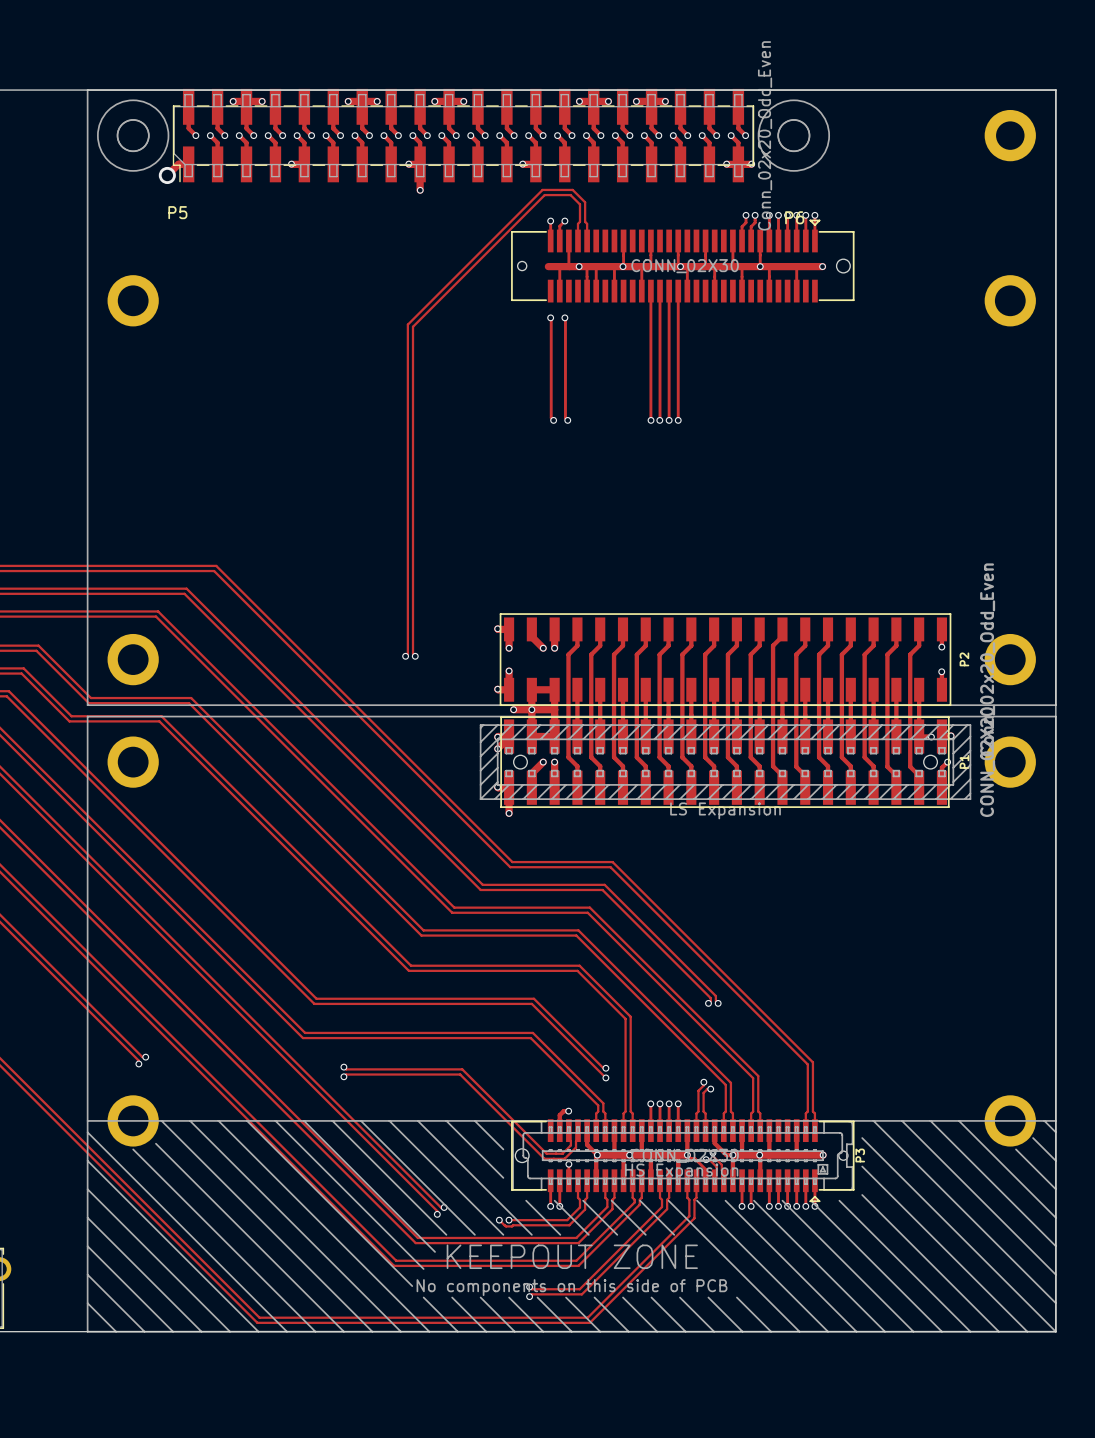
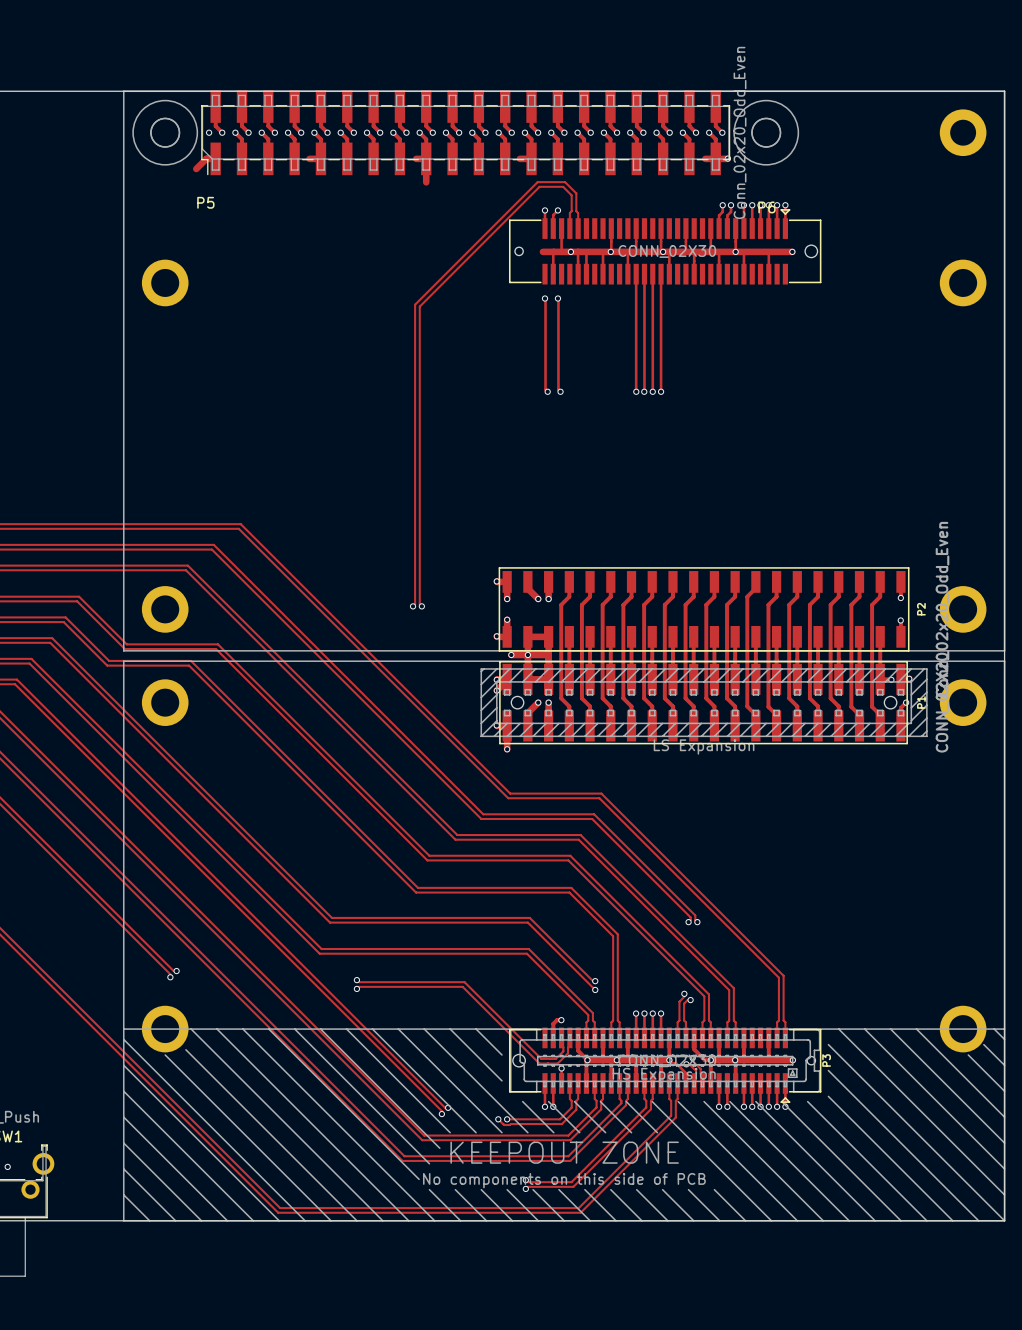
track: (233, 101) (262, 101) -> none
via: (233, 101) -> none
via: (262, 101) -> none
track: (348, 101) (377, 101) -> none
via: (348, 101) -> none
via: (377, 101) -> none
track: (434, 101) (463, 101) -> none
via: (434, 101) -> none
via: (463, 101) -> none
track: (579, 101) (608, 101) -> none
via: (579, 101) -> none
via: (608, 101) -> none
track: (636, 101) (665, 101) -> none
via: (636, 101) -> none
via: (665, 101) -> none
via: none -> (209, 132)
via: (291, 164) -> none
via: (408, 164) -> none
via: (522, 164) -> none
via: (726, 164) -> none
via: (167, 175) -> none
via: (420, 190) -> none

